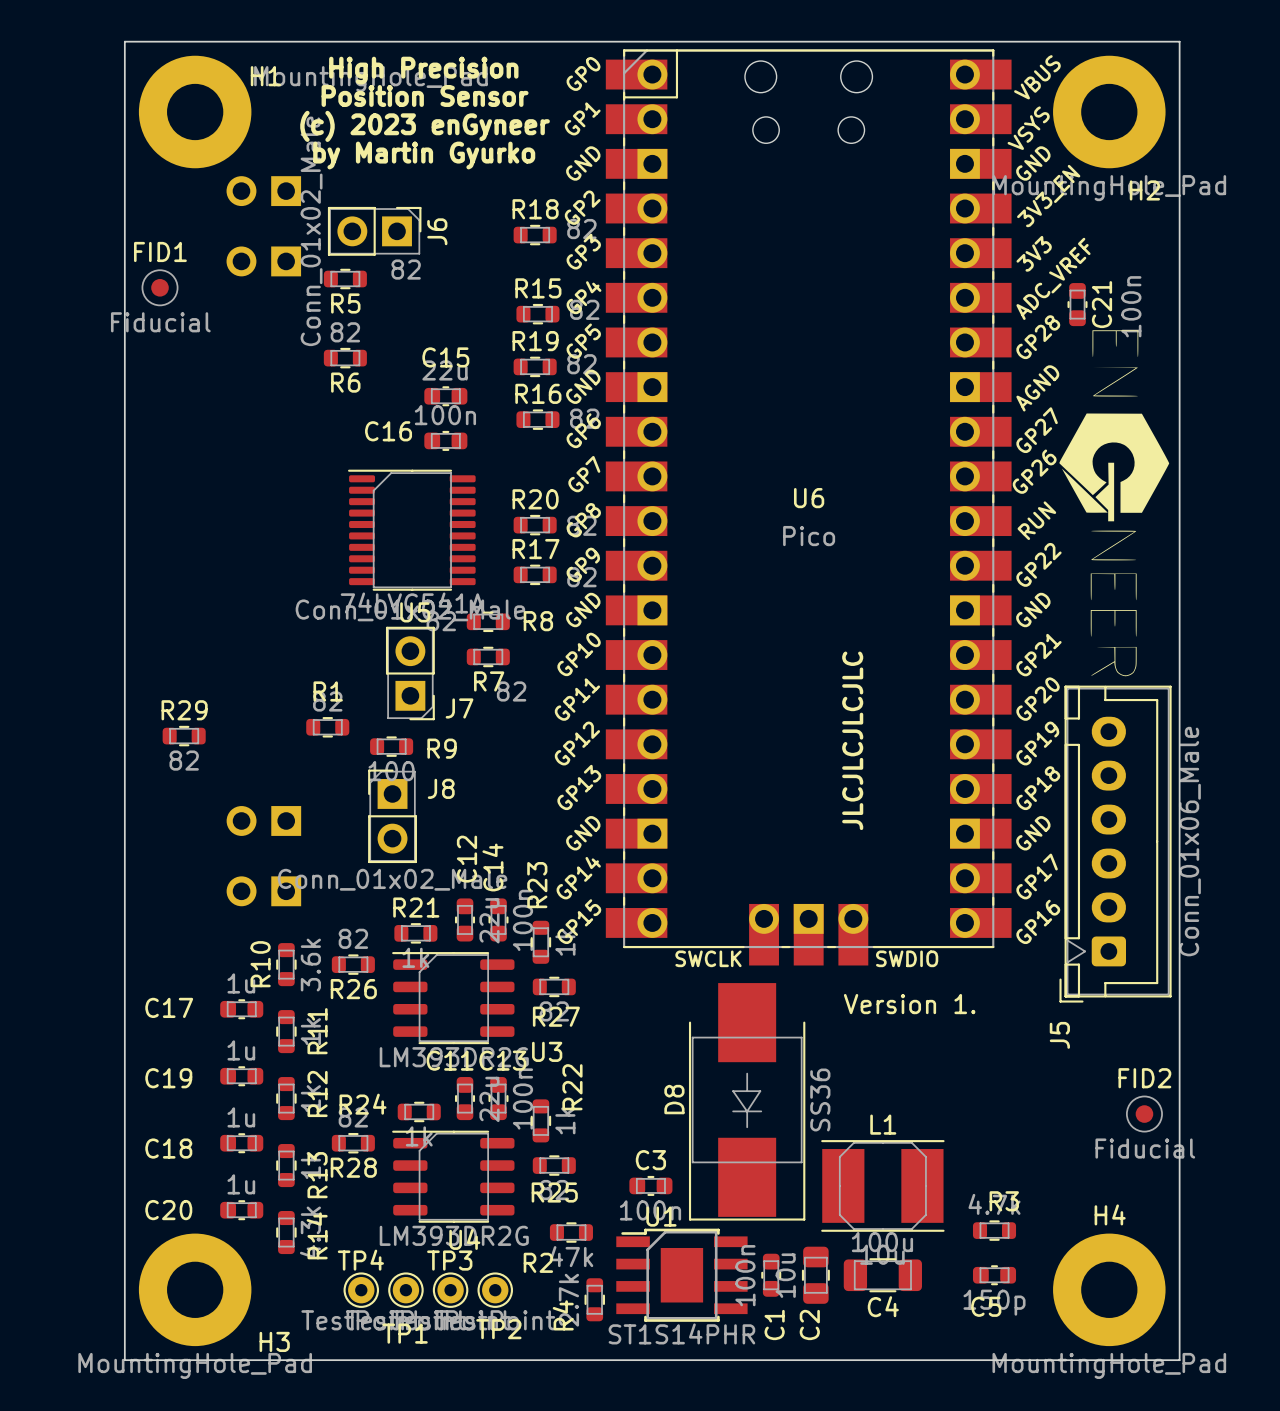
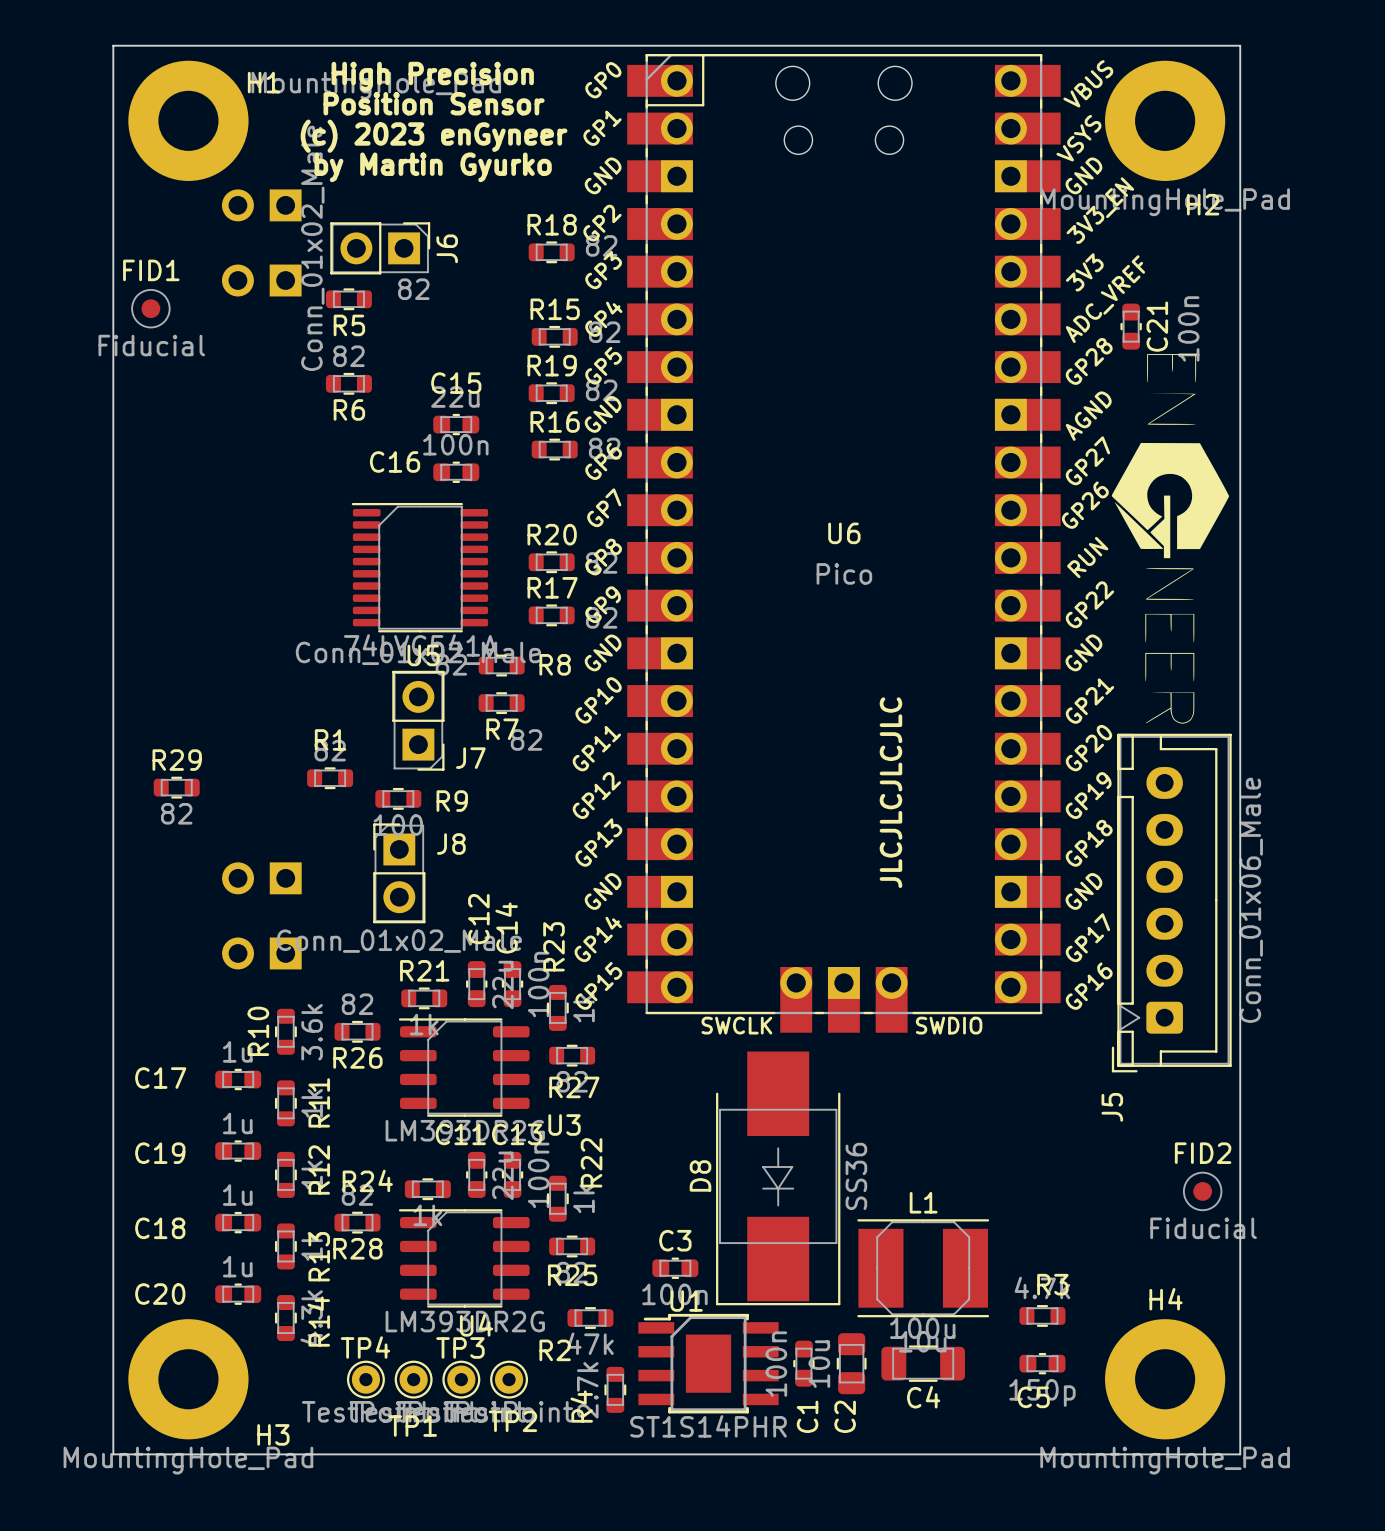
text: Version 1. (909, 1004) -> none

